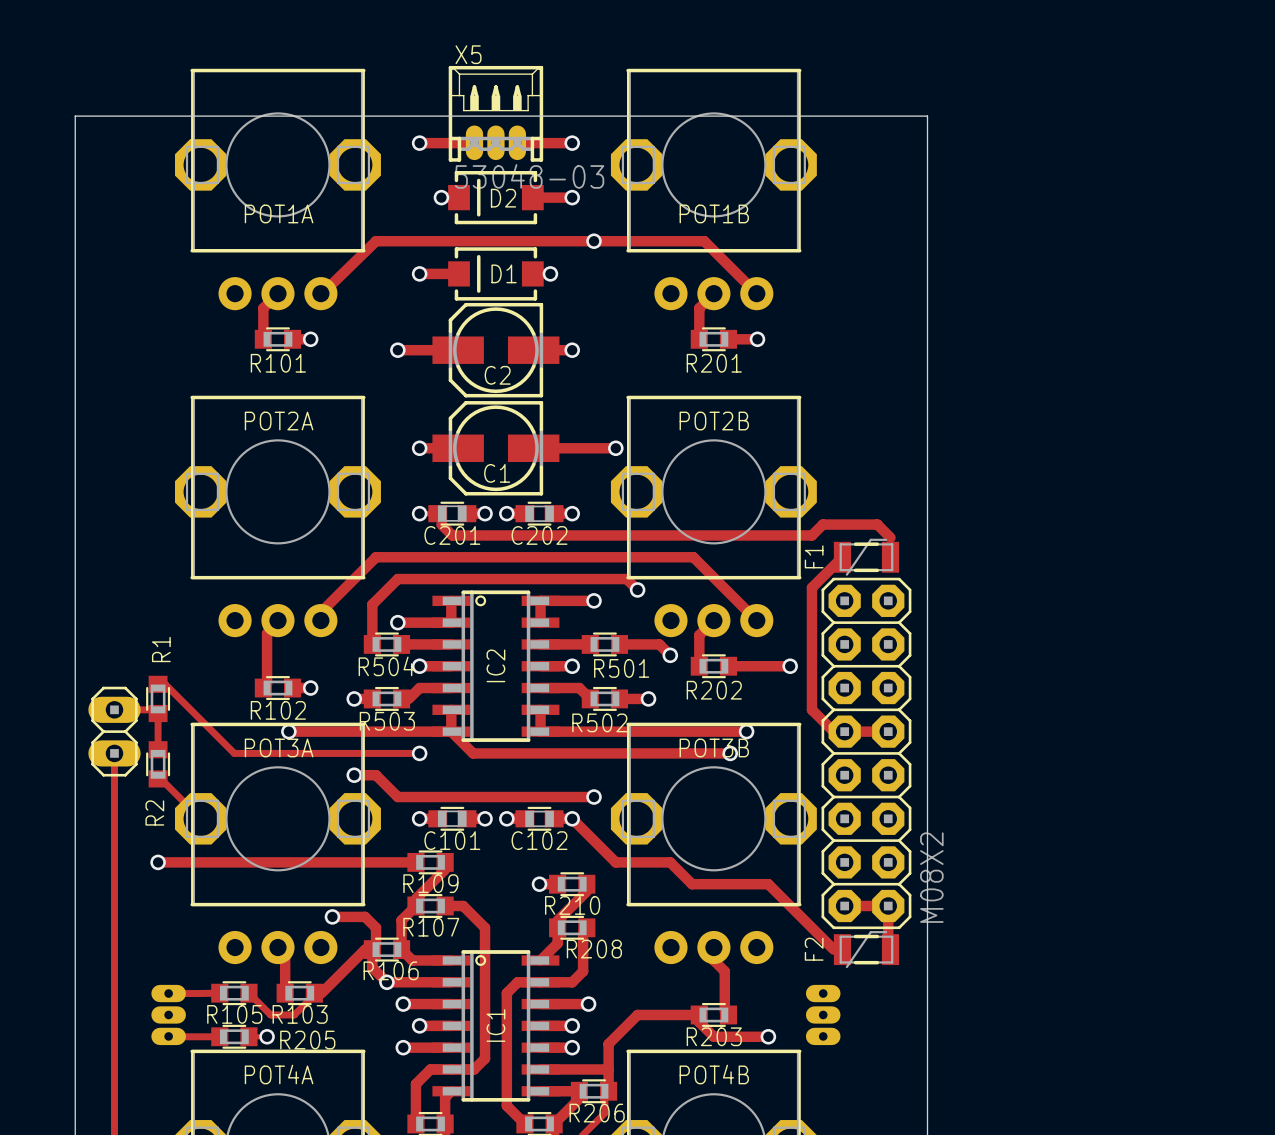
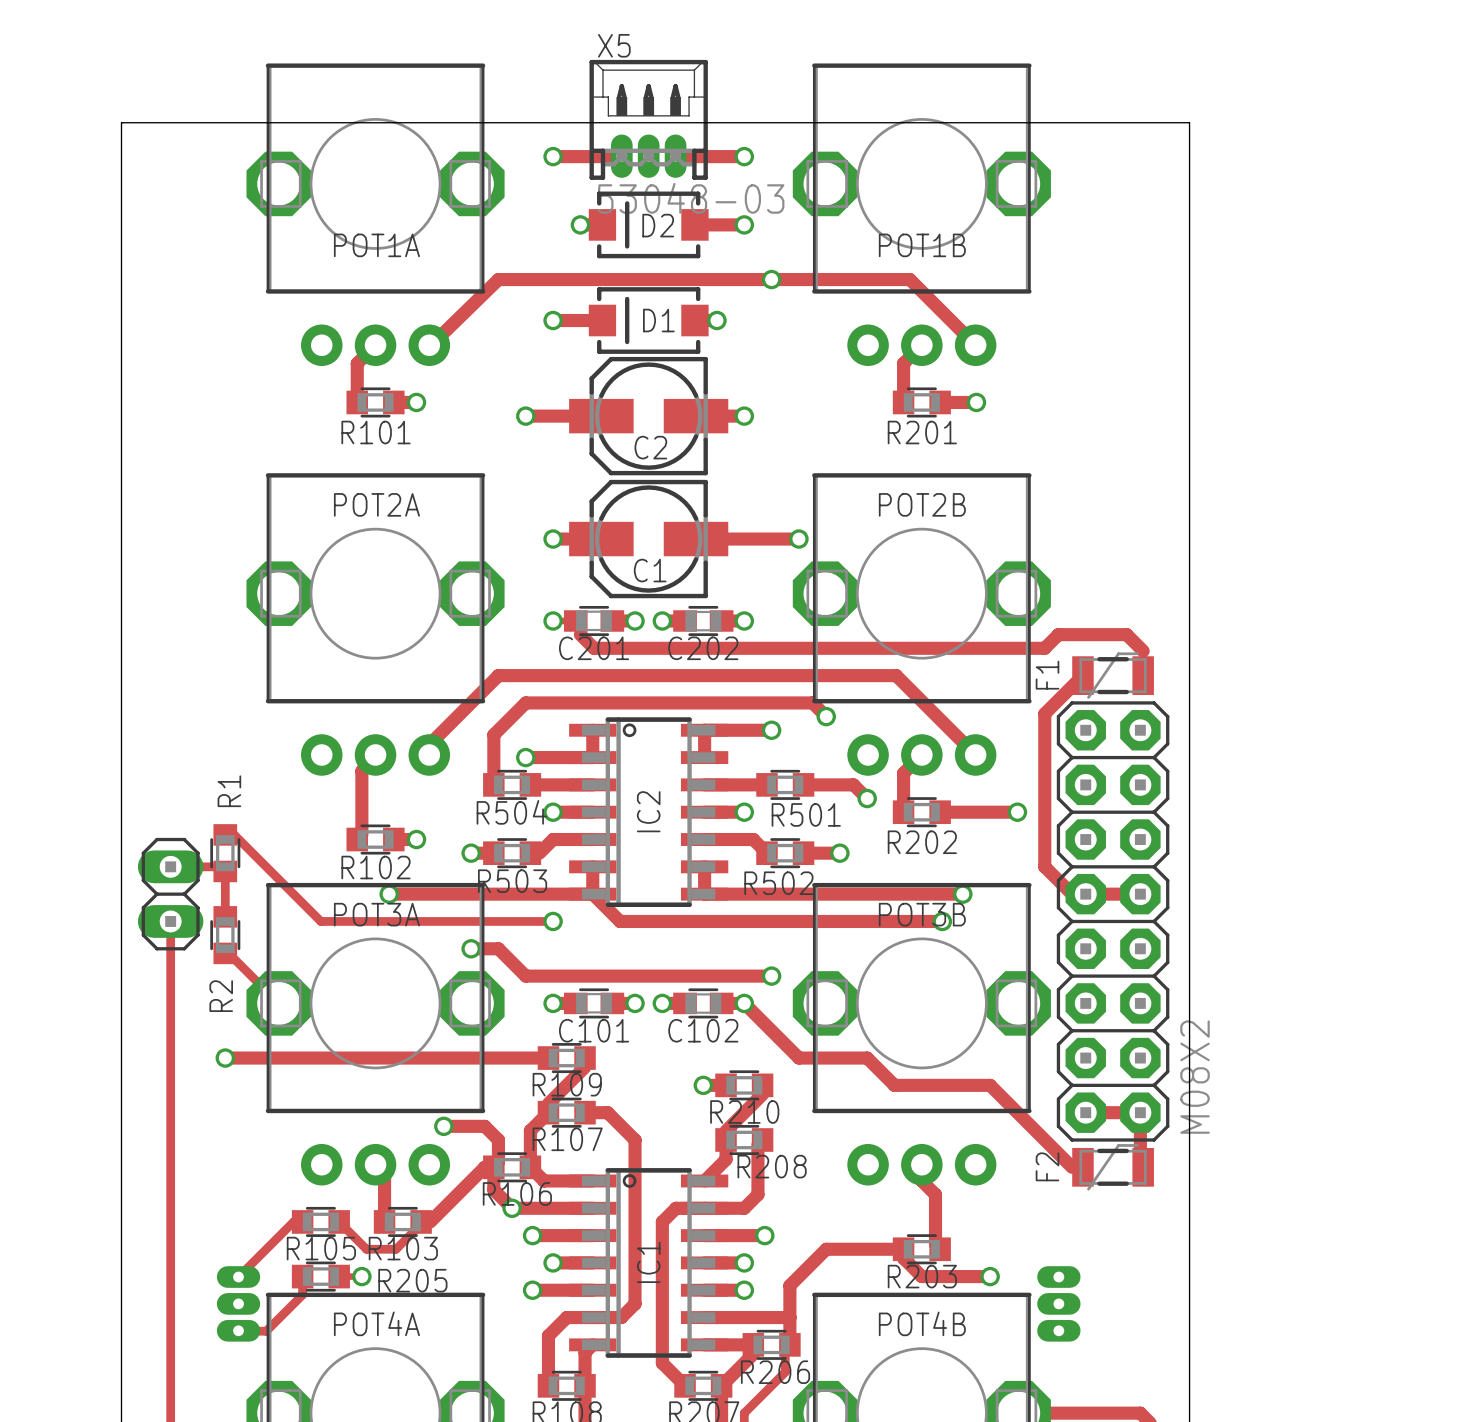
track: (219, 993) (168, 993) -> (302, 1221) (293, 1221) (238, 1277)
part position: (168, 1014) -> (238, 1303)
part position: (823, 1014) -> (1058, 1303)
track: (168, 1036) (219, 1036) -> (238, 1330) (266, 1331) (302, 1294) (302, 1276)

